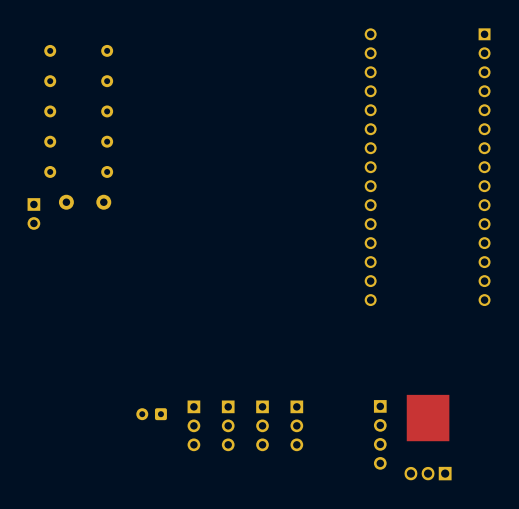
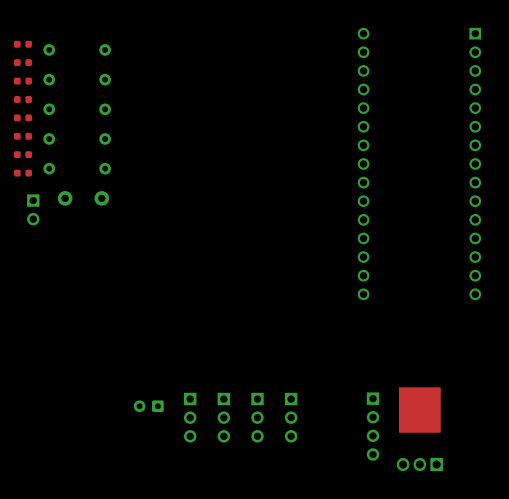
part: none -> (22, 44)
part: none -> (22, 62)
part: none -> (22, 81)
part: none -> (22, 99)
part: none -> (22, 117)
part: none -> (22, 136)
part: none -> (22, 154)
part: none -> (22, 173)

